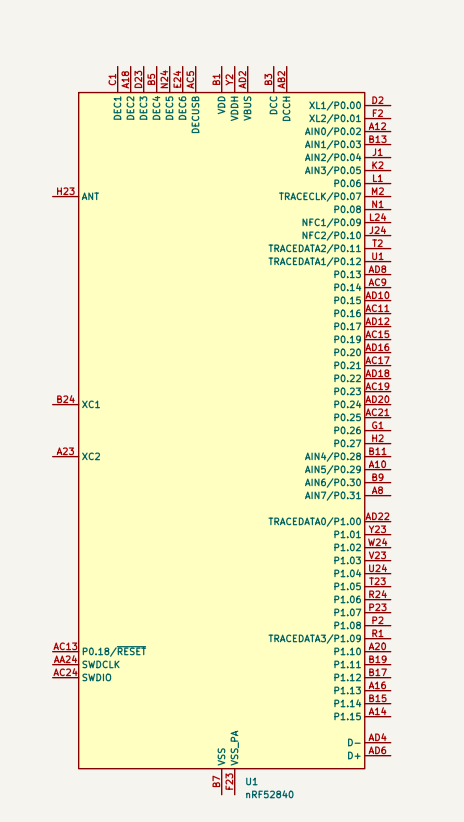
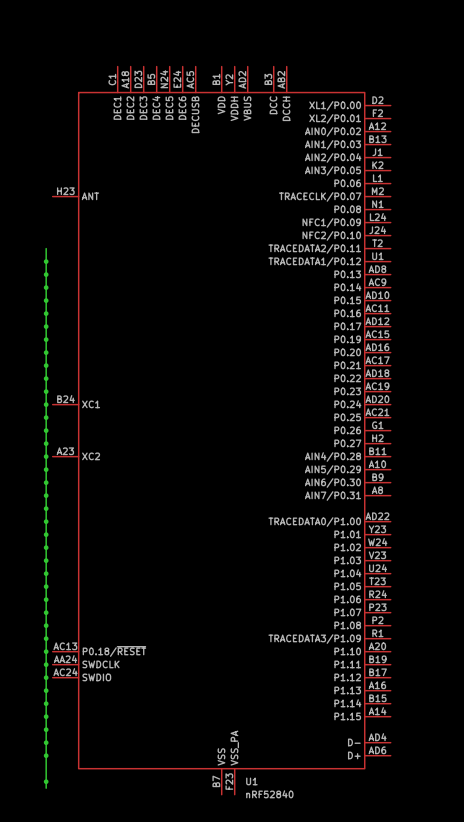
wire: none -> (46, 248) (46, 788)
junction: none -> (46, 261)
junction: none -> (46, 274)
junction: none -> (46, 287)
junction: none -> (46, 300)
junction: none -> (46, 313)
junction: none -> (46, 326)
junction: none -> (46, 339)
junction: none -> (46, 352)
junction: none -> (46, 365)
junction: none -> (46, 378)
junction: none -> (46, 391)
junction: none -> (46, 404)
junction: none -> (46, 417)
junction: none -> (46, 430)
junction: none -> (46, 443)
junction: none -> (46, 456)
junction: none -> (46, 469)
junction: none -> (46, 482)
junction: none -> (46, 495)
junction: none -> (46, 508)
junction: none -> (46, 521)
junction: none -> (46, 534)
junction: none -> (46, 547)
junction: none -> (46, 560)
junction: none -> (46, 573)
junction: none -> (46, 586)
junction: none -> (46, 599)
junction: none -> (46, 612)
junction: none -> (46, 625)
junction: none -> (46, 638)
junction: none -> (46, 651)
junction: none -> (46, 664)
junction: none -> (46, 677)
junction: none -> (46, 690)
junction: none -> (46, 703)
junction: none -> (46, 716)
junction: none -> (46, 729)
junction: none -> (46, 742)
junction: none -> (46, 755)
junction: none -> (46, 781)

